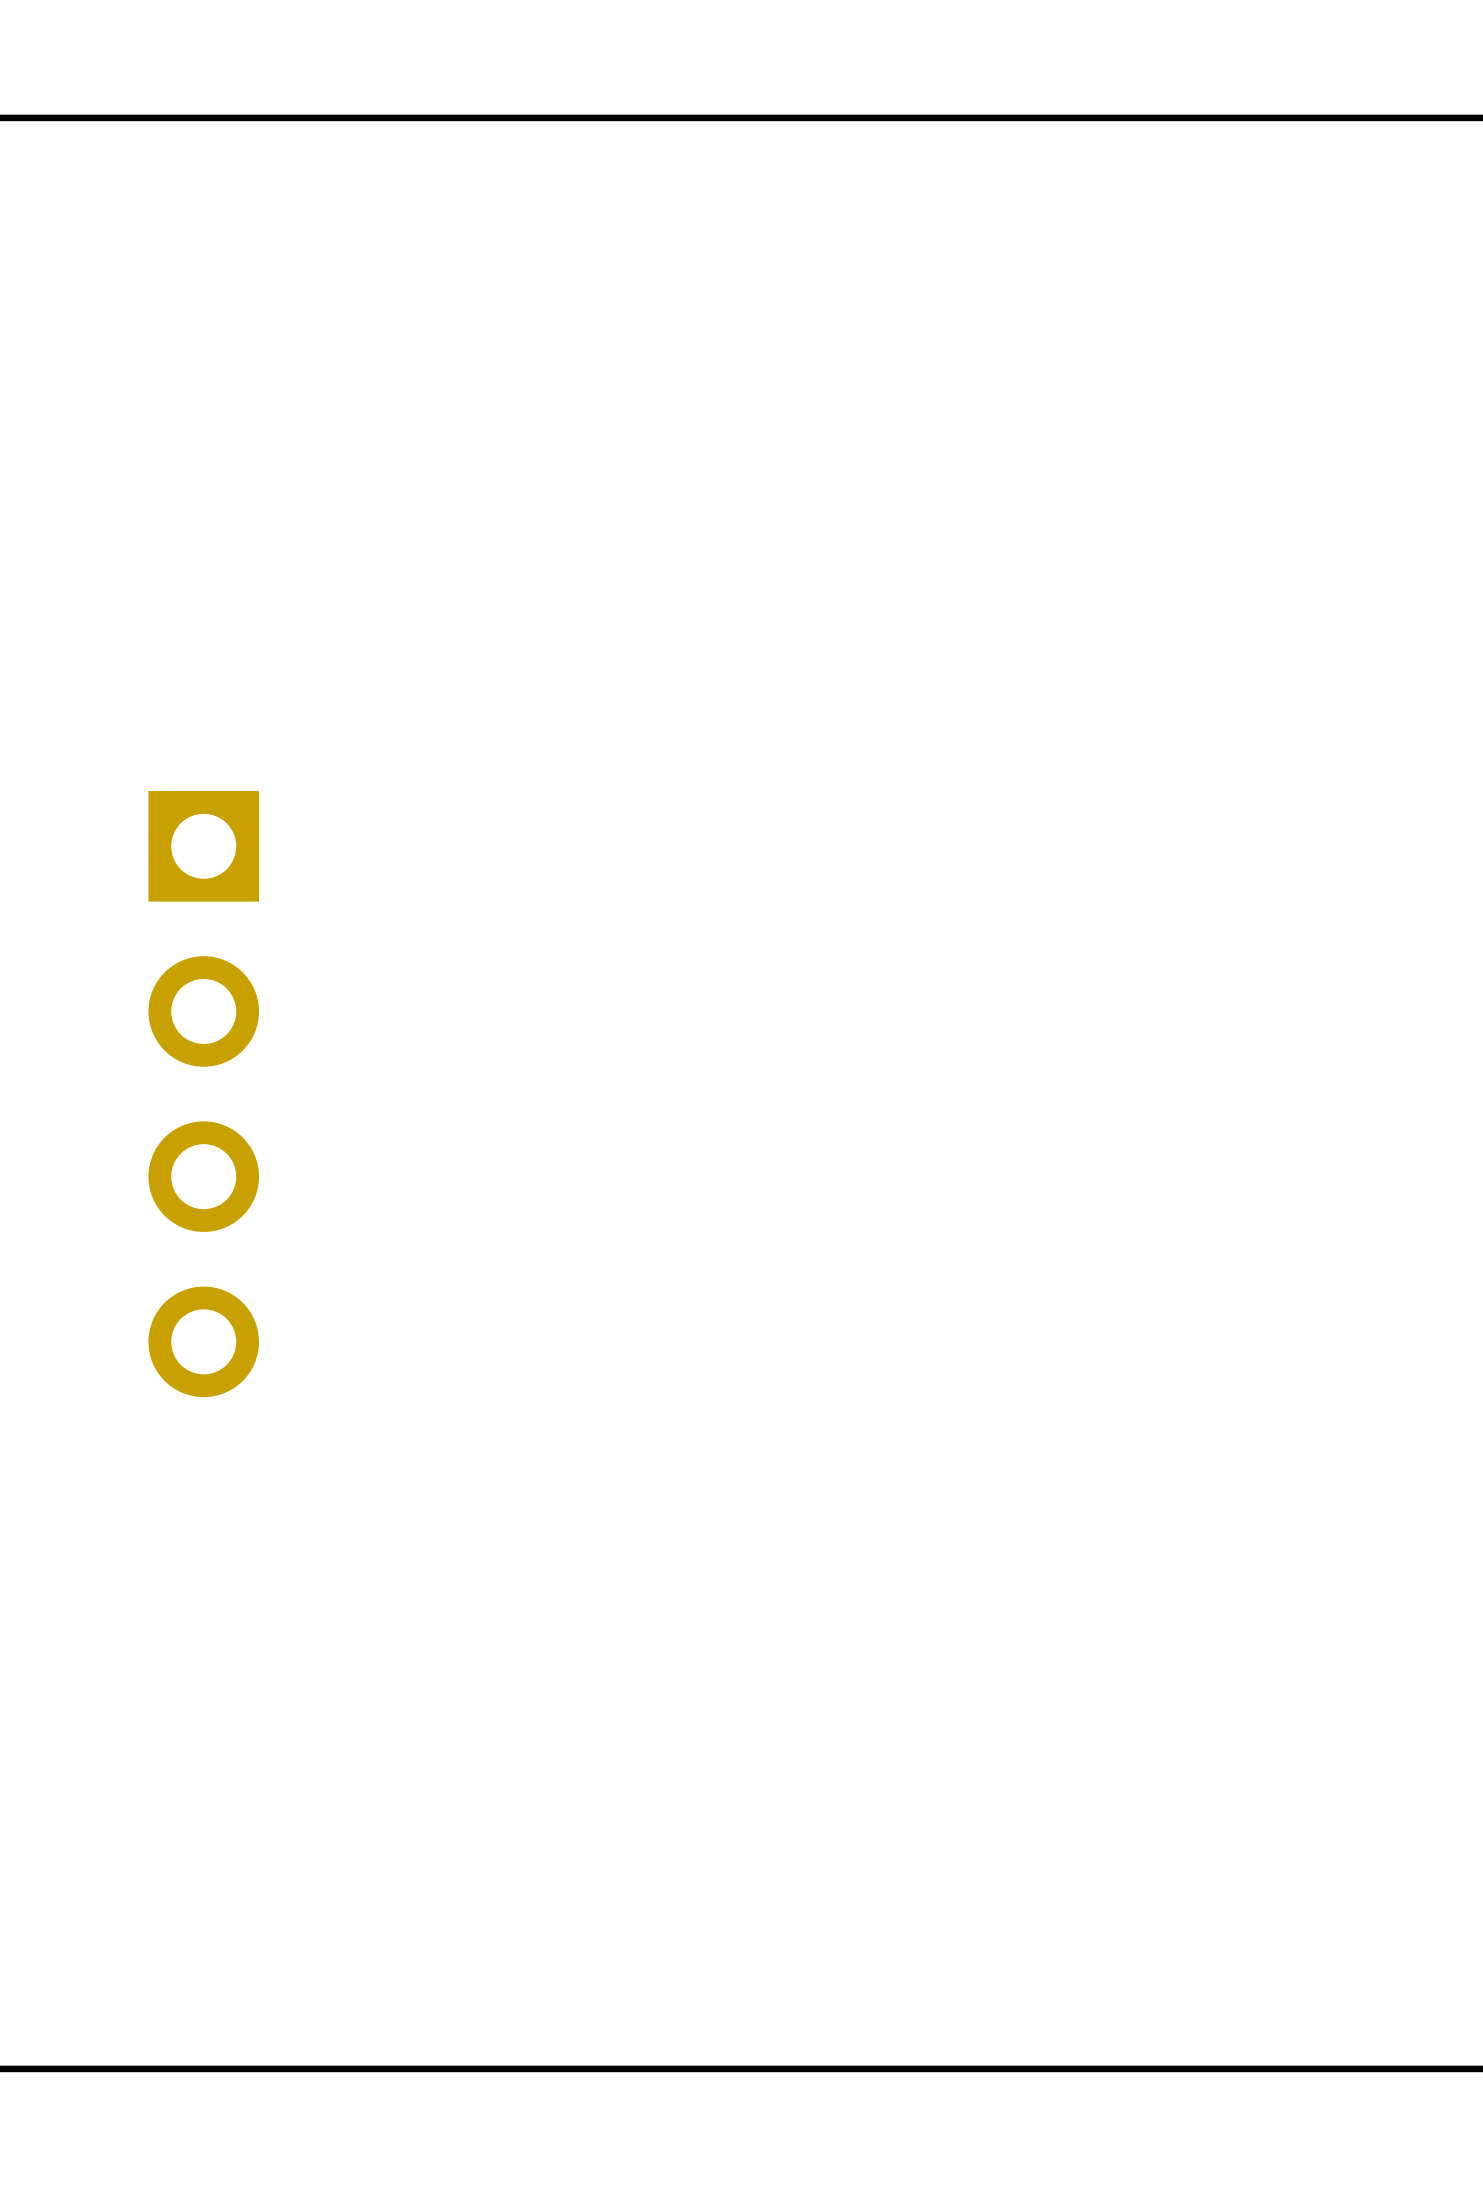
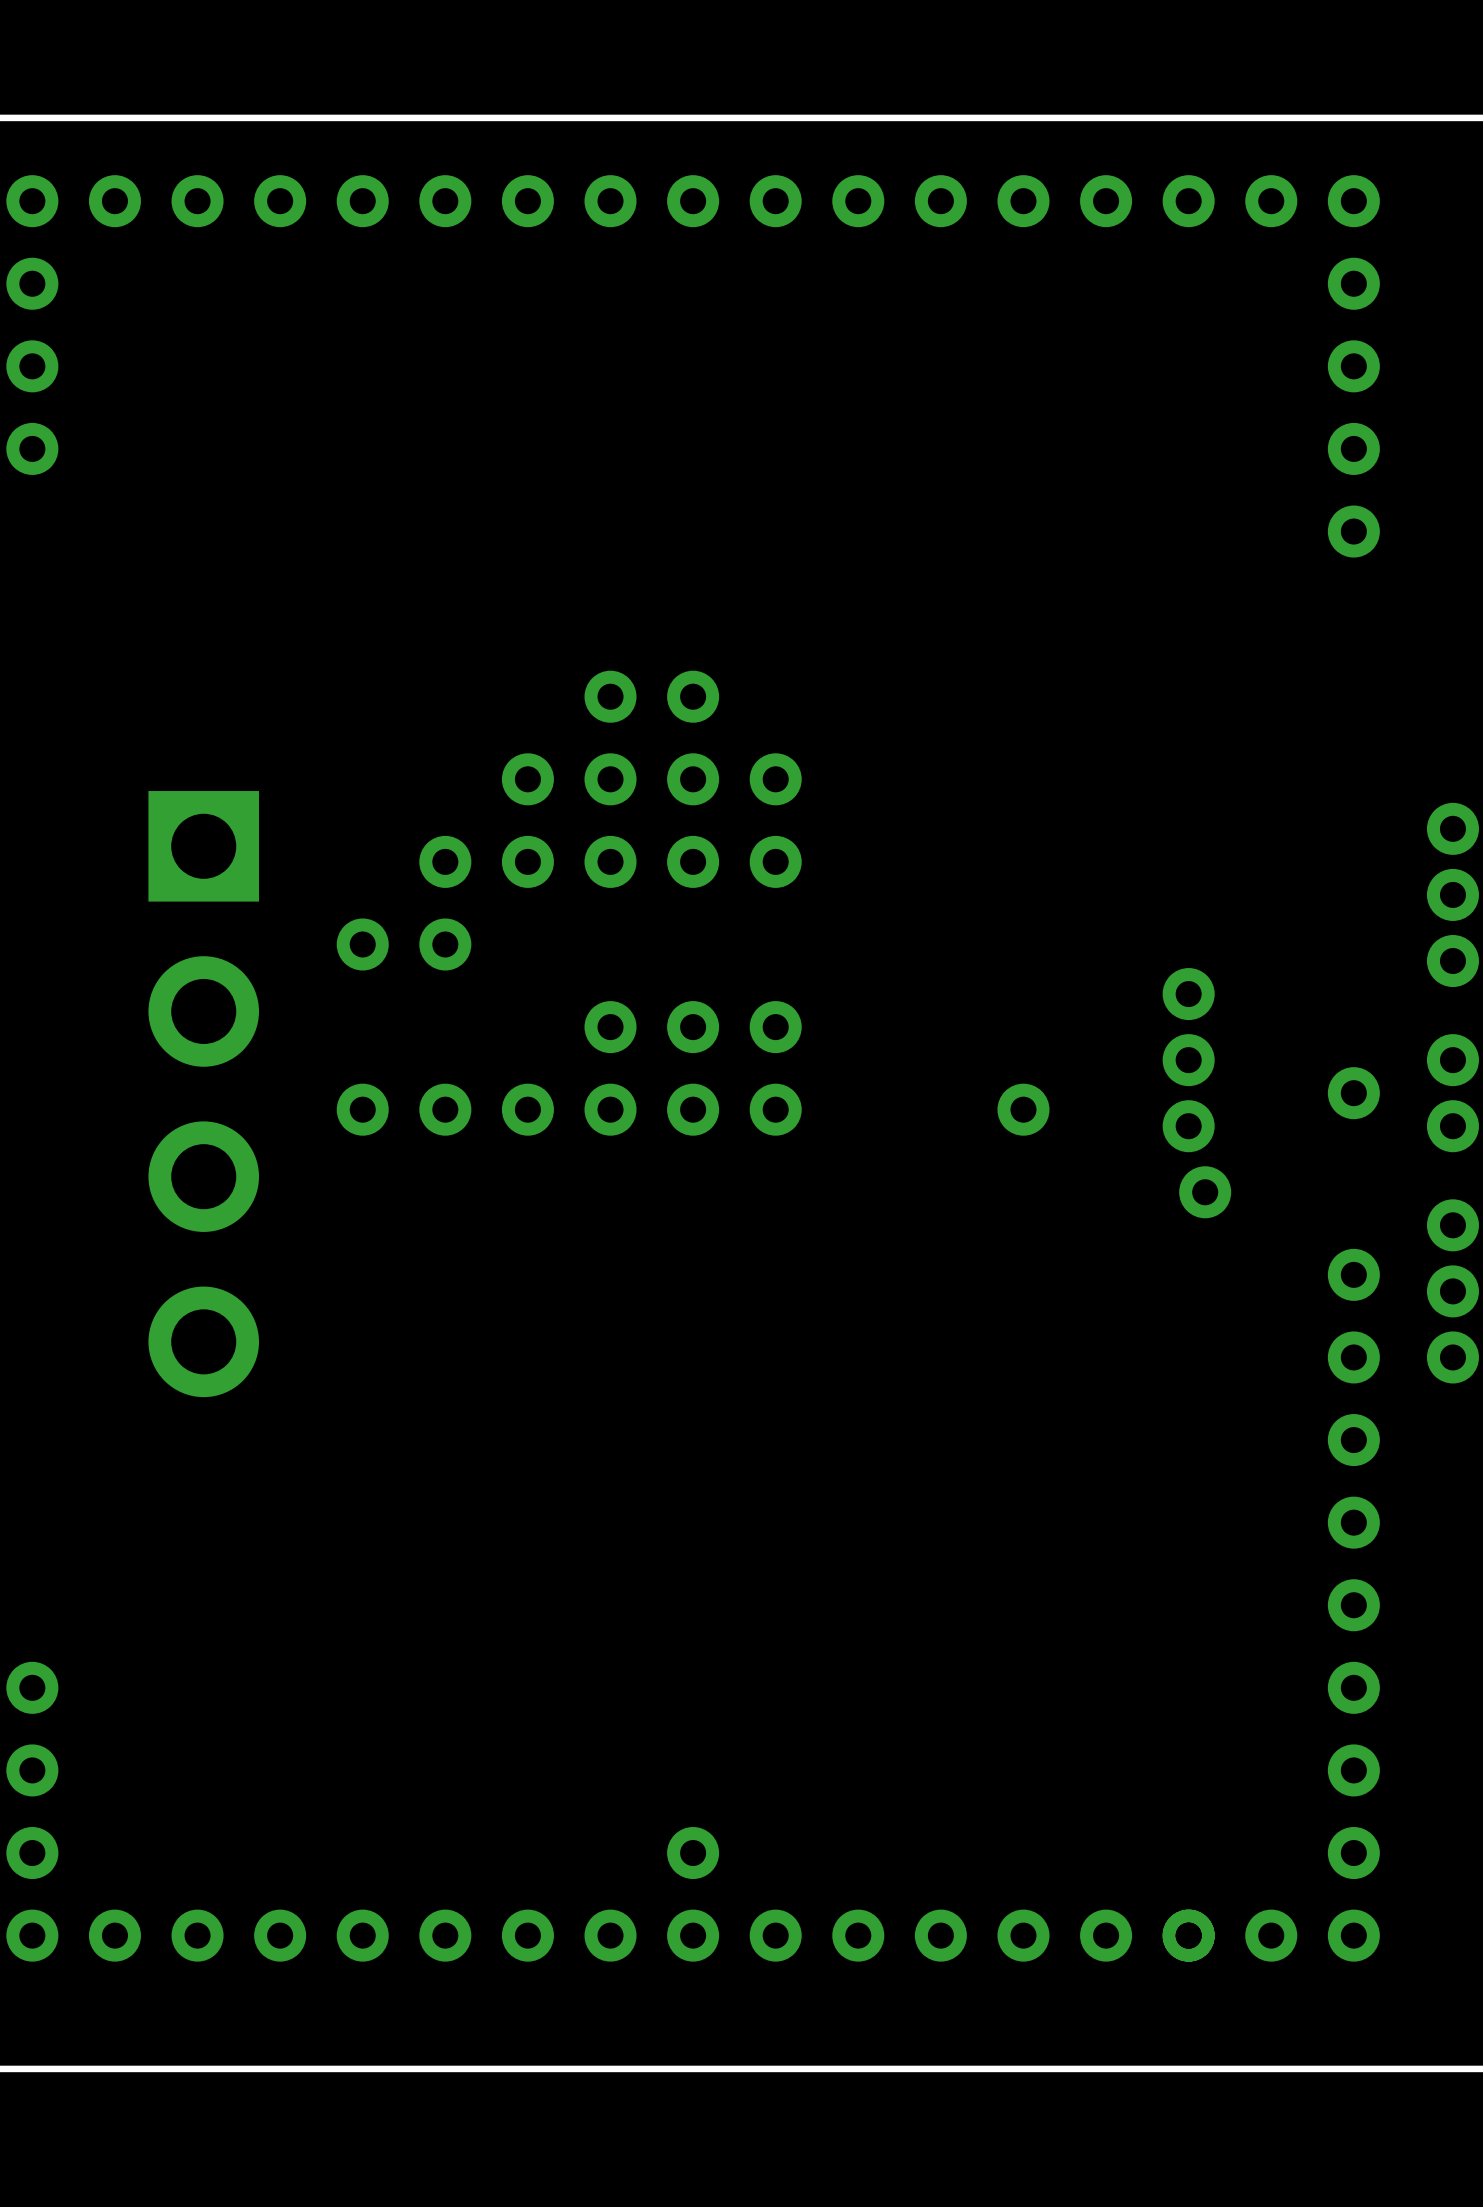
via: none -> (32, 201)
via: none -> (114, 201)
via: none -> (197, 201)
via: none -> (280, 201)
via: none -> (362, 201)
via: none -> (445, 201)
via: none -> (527, 201)
via: none -> (610, 201)
via: none -> (693, 201)
via: none -> (775, 201)
via: none -> (858, 201)
via: none -> (940, 201)
via: none -> (1023, 201)
via: none -> (1106, 201)
via: none -> (1188, 201)
via: none -> (1271, 201)
via: none -> (1353, 201)
via: none -> (32, 283)
via: none -> (1353, 283)
via: none -> (32, 366)
via: none -> (1353, 366)
via: none -> (32, 448)
via: none -> (1353, 448)
via: none -> (1353, 531)
via: none -> (610, 696)
via: none -> (693, 696)
via: none -> (527, 779)
via: none -> (610, 779)
via: none -> (693, 779)
via: none -> (775, 779)
via: none -> (1452, 828)
via: none -> (445, 861)
via: none -> (527, 861)
via: none -> (610, 861)
via: none -> (693, 861)
via: none -> (775, 861)
via: none -> (1452, 894)
via: none -> (362, 944)
via: none -> (445, 944)
via: none -> (1452, 961)
via: none -> (1188, 994)
via: none -> (610, 1027)
via: none -> (693, 1027)
via: none -> (775, 1027)
via: none -> (1188, 1060)
via: none -> (1452, 1060)
via: none -> (1353, 1093)
via: none -> (362, 1109)
via: none -> (445, 1109)
via: none -> (527, 1109)
via: none -> (610, 1109)
via: none -> (693, 1109)
via: none -> (775, 1109)
via: none -> (1023, 1109)
via: none -> (1188, 1126)
via: none -> (1452, 1126)
via: none -> (1205, 1192)
via: none -> (1452, 1225)
via: none -> (1353, 1274)
via: none -> (1452, 1291)
via: none -> (1353, 1357)
via: none -> (1452, 1357)
via: none -> (1353, 1440)
via: none -> (1353, 1522)
via: none -> (1353, 1605)
via: none -> (32, 1687)
via: none -> (1353, 1687)
via: none -> (32, 1770)
via: none -> (1353, 1770)
via: none -> (32, 1853)
via: none -> (693, 1853)
via: none -> (1353, 1853)
via: none -> (32, 1935)
via: none -> (114, 1935)
via: none -> (197, 1935)
via: none -> (280, 1935)
via: none -> (362, 1935)
via: none -> (445, 1935)
via: none -> (527, 1935)
via: none -> (610, 1935)
via: none -> (693, 1935)
via: none -> (775, 1935)
via: none -> (858, 1935)
via: none -> (940, 1935)
via: none -> (1023, 1935)
via: none -> (1106, 1935)
via: none -> (1188, 1935)
via: none -> (1271, 1935)
via: none -> (1353, 1935)

